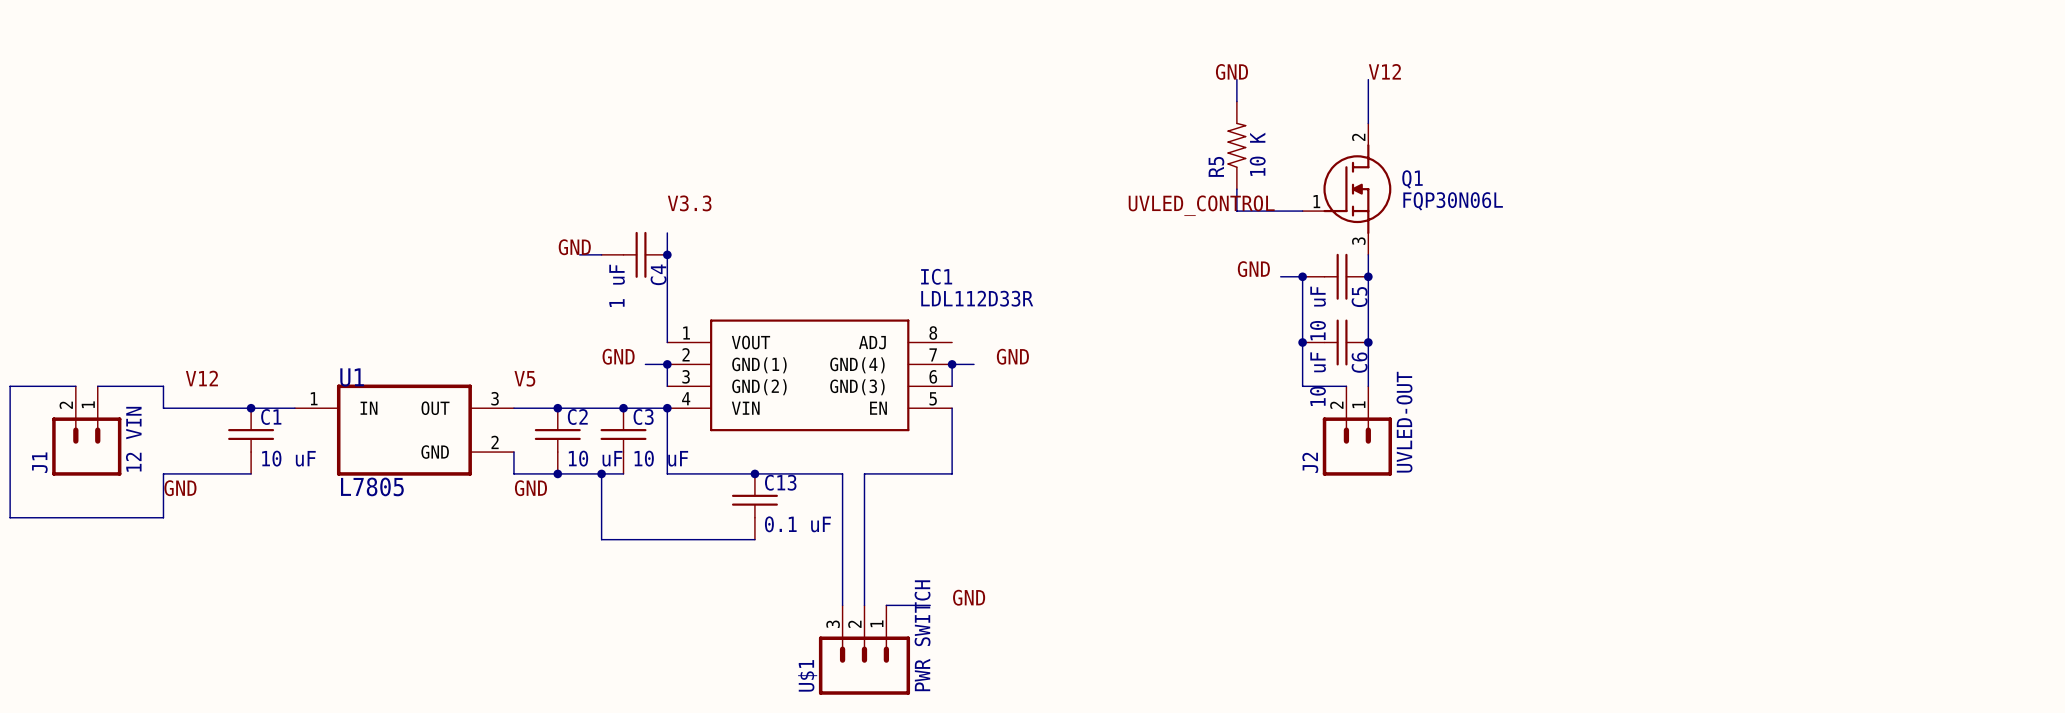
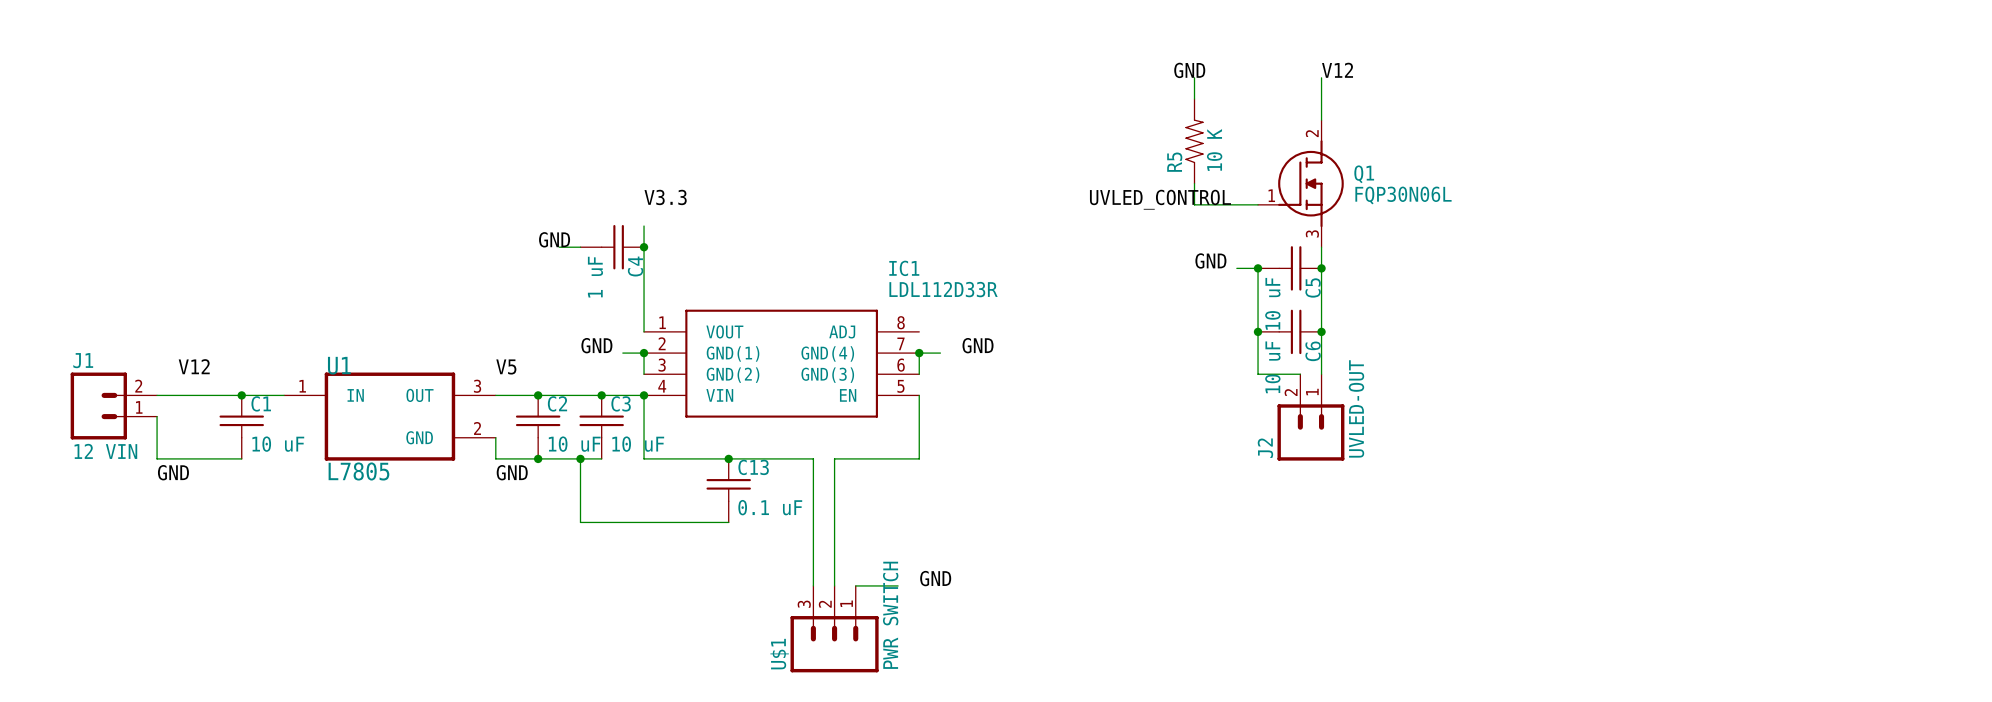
wire: (75, 386) (10, 386) (10, 517) (163, 517) (163, 473) -> (157, 416) (157, 458)
wire: (97, 386) (163, 386) (163, 408) -> none
J1 rotation: 0° (86, 446) -> 90° clockwise (98, 406)

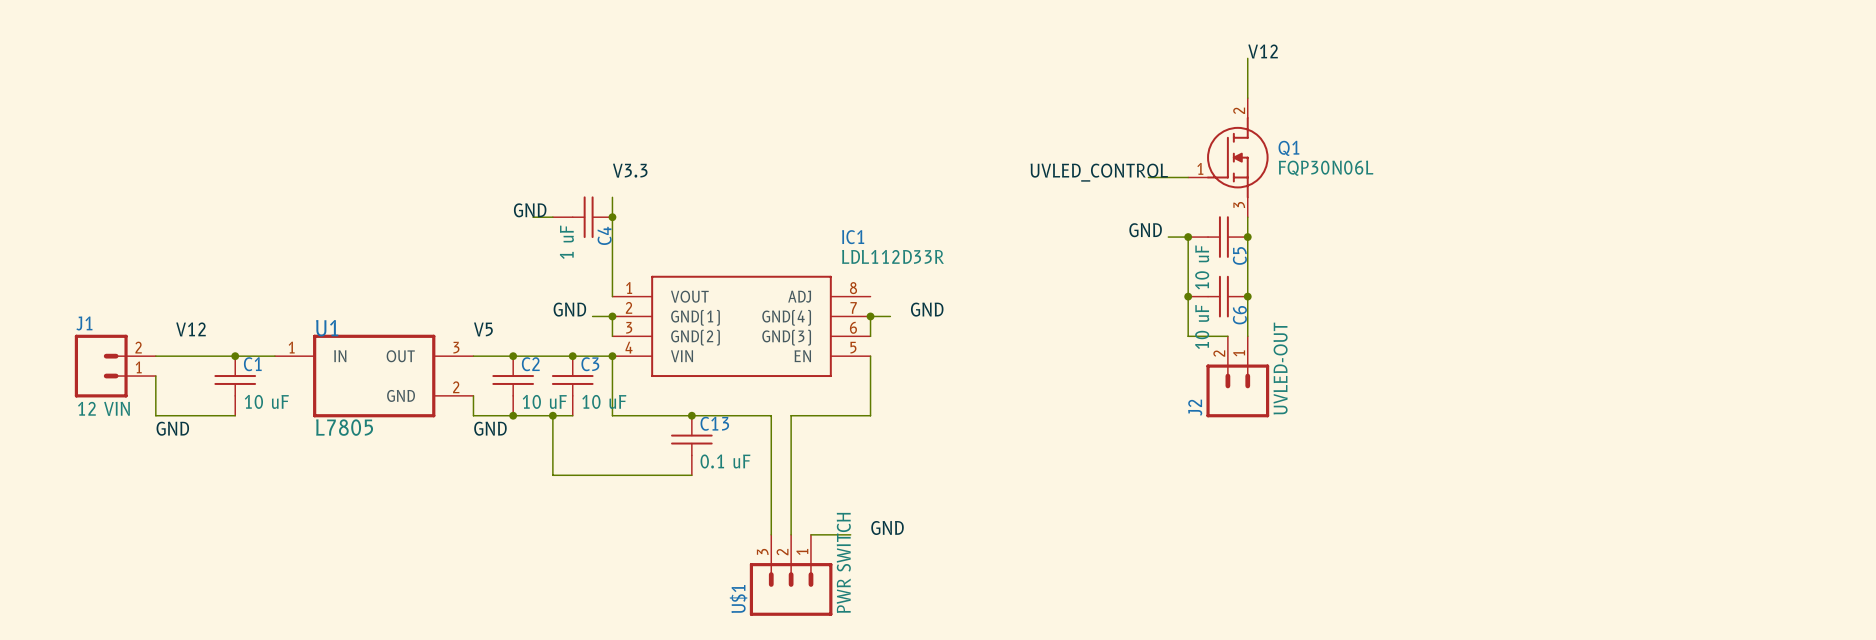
label: GND (1189, 70) -> none
wire: (1194, 77) (1194, 99) -> none
R5: 10 K (1194, 141) -> none
wire: (1194, 183) (1194, 204) (1215, 204) -> none

